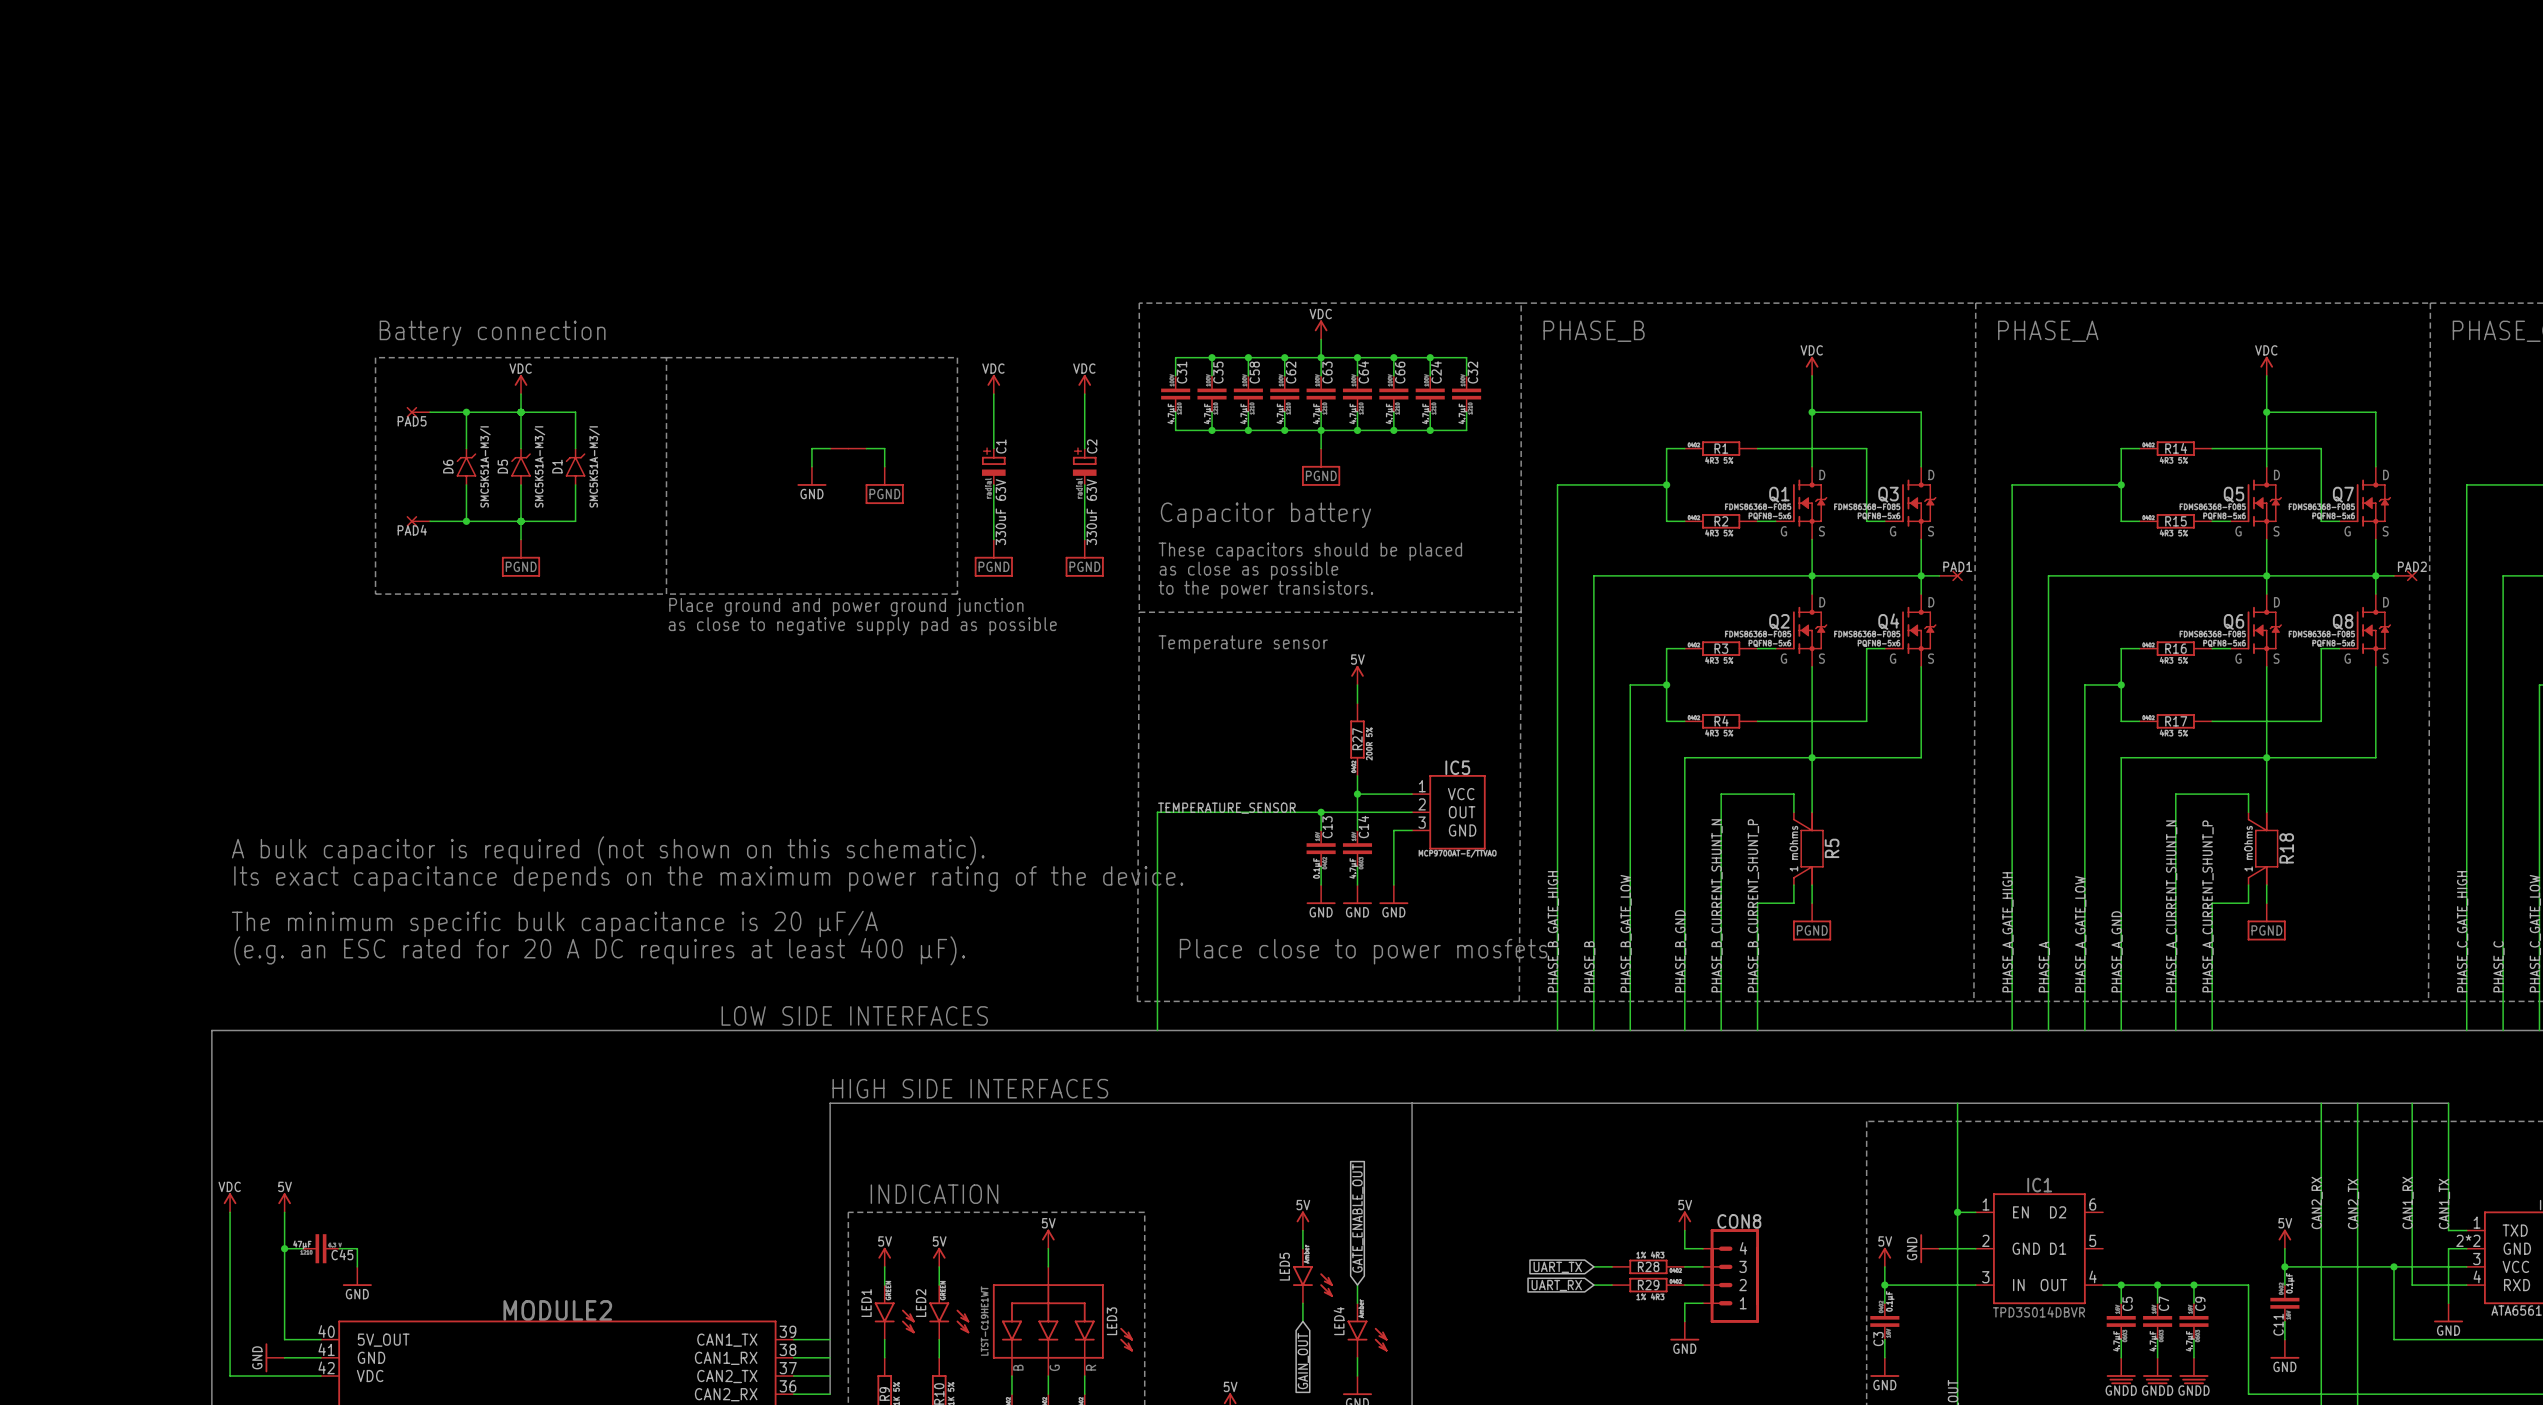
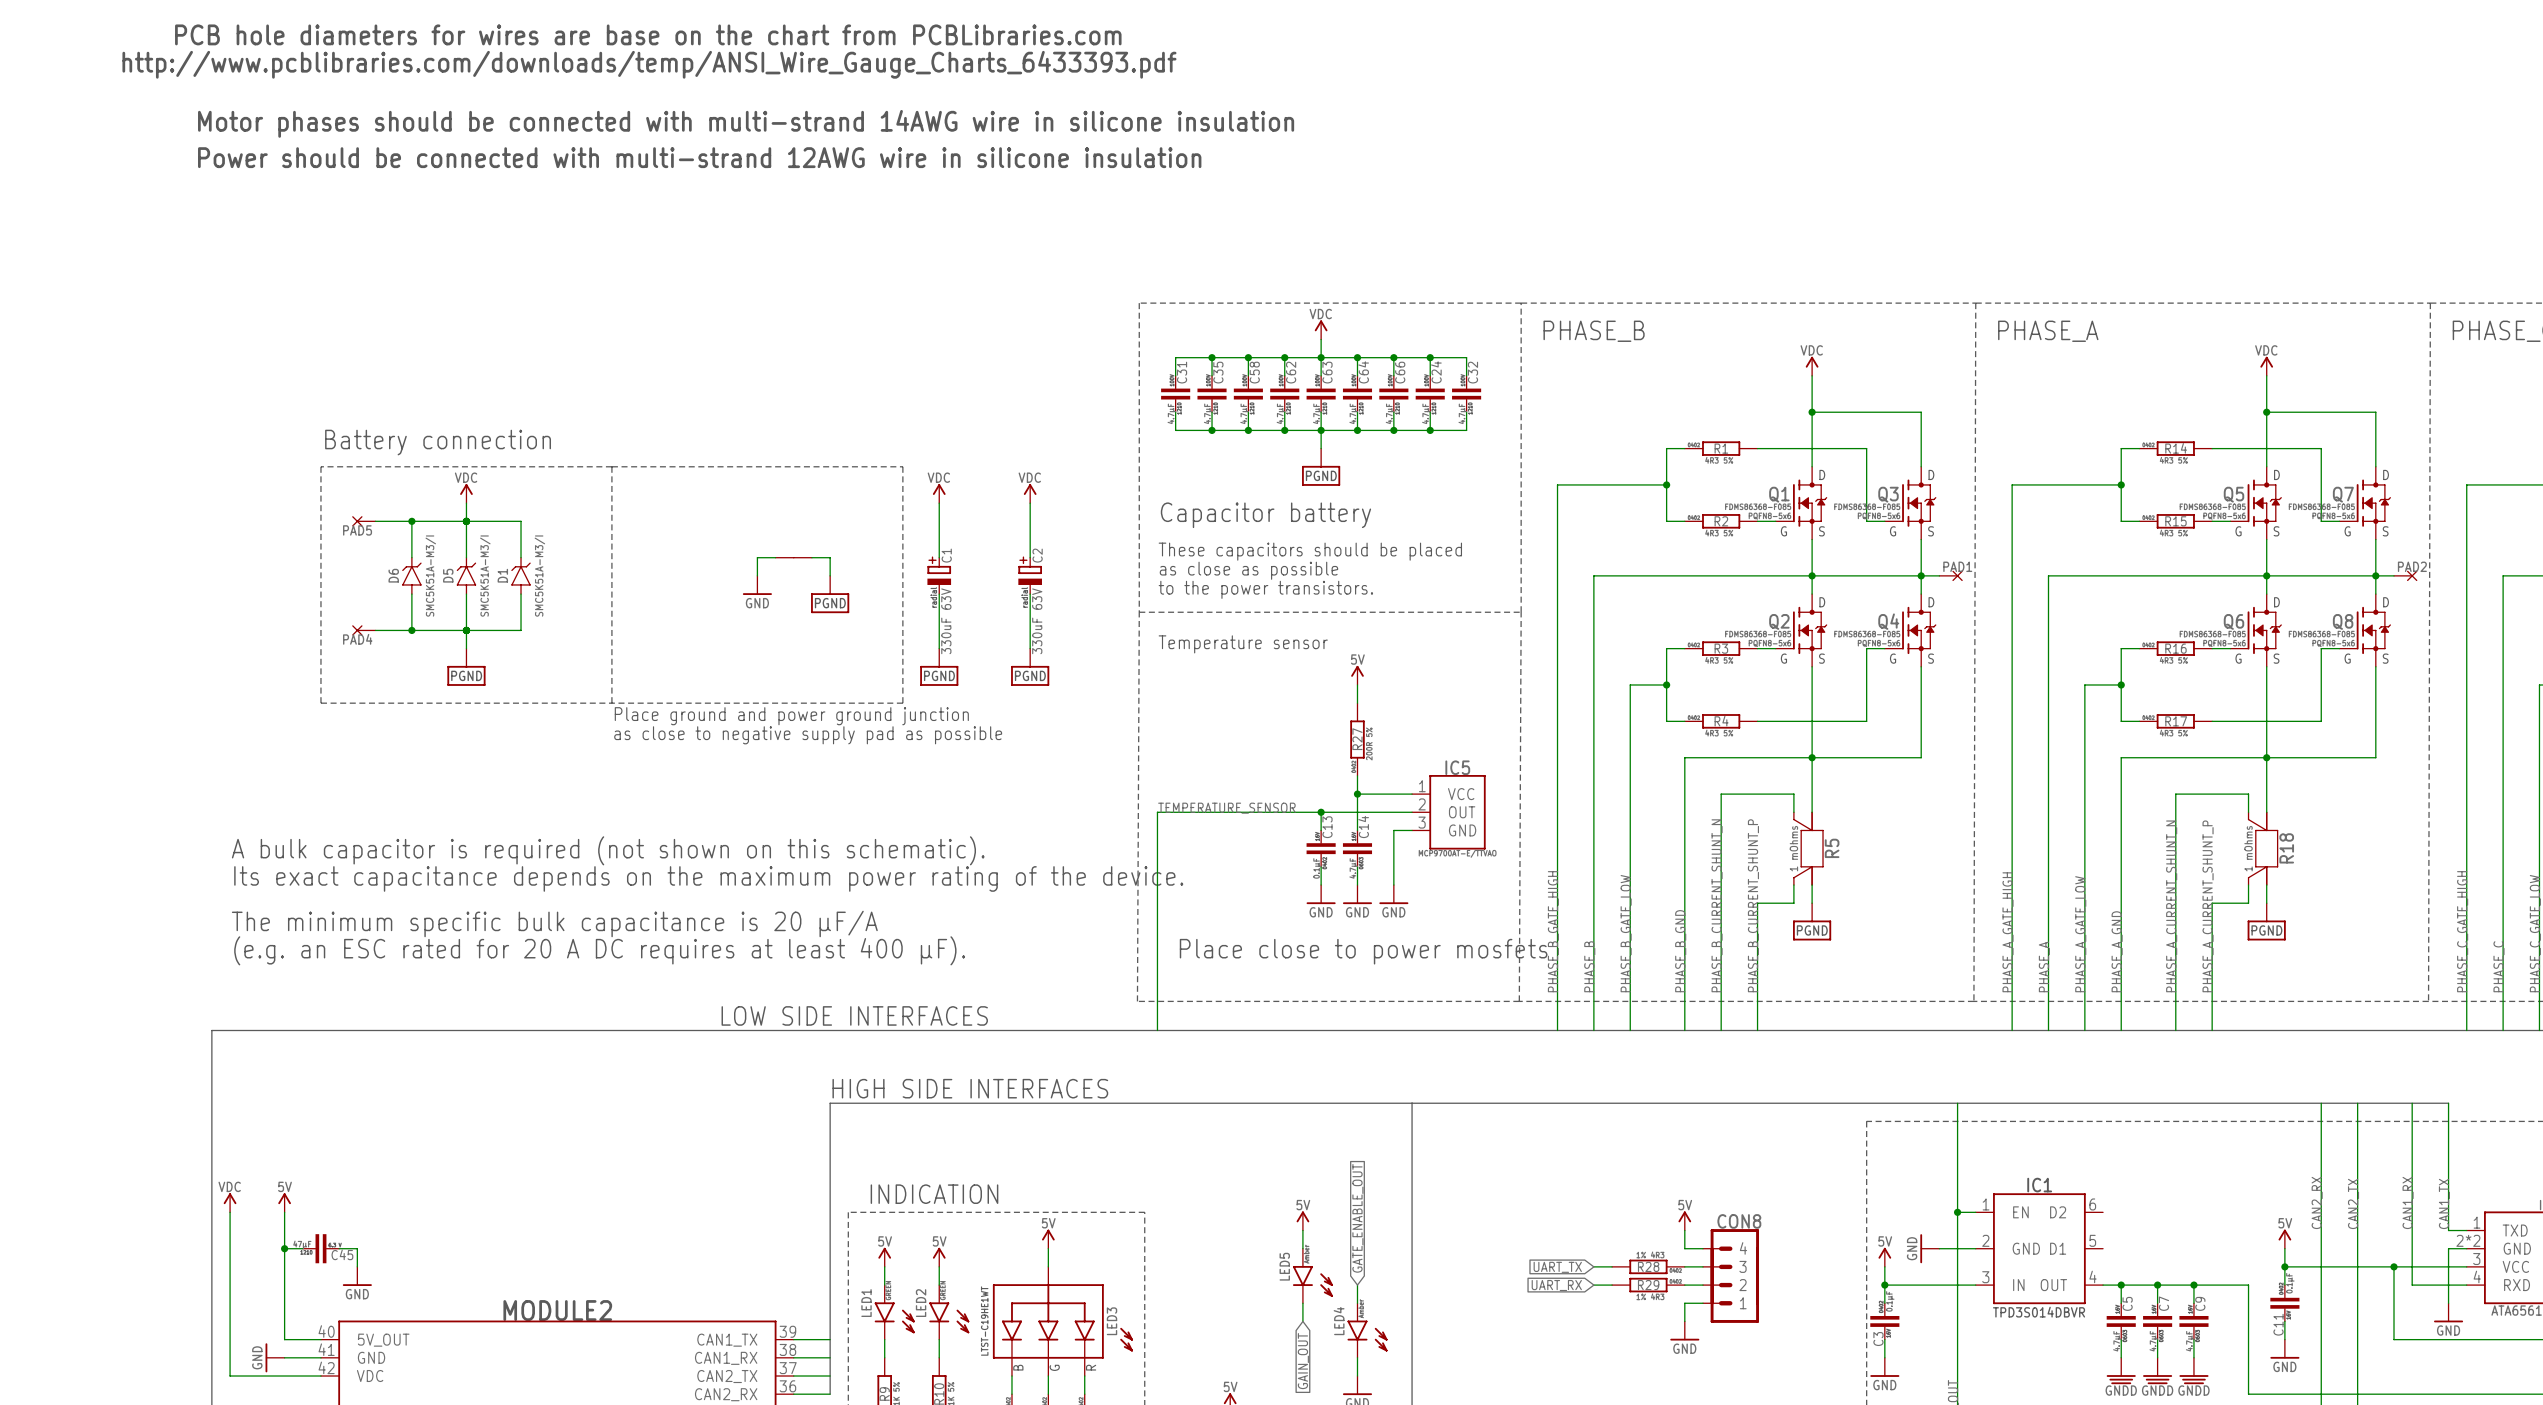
text: none -> PCB hole diameters for wires are base on the chart from PCBLibraries.com (648, 34)
text: none -> http://www.pcblibraries.com/downloads/temp/ANSI_Wire_Gauge_Charts_6433393.pdf (649, 64)
text: none -> Motor phases should be connected with multi-strand 14AWG wire in silicone insulation (746, 123)
text: none -> Power should be connected with multi-strand 12AWG wire in silicone insulation (699, 157)
text position: Battery connection (492, 333) -> Battery connection (438, 442)
line: (375, 357) (375, 594) (957, 594) (957, 357) (375, 357) -> (320, 466) (320, 703) (902, 703) (902, 466) (320, 466)
line: (666, 357) (666, 594) -> (611, 466) (611, 703)
power symbol position: VDC (521, 384) -> VDC (466, 493)
power symbol: VDC (993, 384) -> none
power symbol: VDC (1084, 384) -> none
wire: (521, 394) (521, 448) -> none
wire: (993, 394) (993, 448) -> (939, 503) (939, 557)
wire: (1084, 394) (1084, 448) -> (1030, 503) (1030, 557)
PAD5 position: (418, 412) -> (363, 521)
wire: (430, 412) (575, 412) (575, 448) -> none
wire: (466, 412) (466, 448) -> (411, 521) (411, 557)
junction: (466, 412) -> none
junction: (521, 412) -> none
wire: (830, 448) (811, 448) (811, 466) -> (775, 557) (757, 557) (757, 575)
part position: (848, 448) -> (793, 557)
wire: (866, 448) (884, 448) (884, 466) -> (811, 557) (830, 557) (830, 575)
D6 position: (466, 466) -> (411, 575)
D5 position: (521, 466) -> (466, 575)
D1 position: (575, 466) -> (521, 575)
C1 position: (993, 466) -> (939, 575)
C2 position: (1084, 466) -> (1030, 575)
power symbol position: GND (811, 476) -> GND (757, 585)
wire: (521, 484) (521, 521) (575, 521) (575, 484) -> none
wire: (993, 484) (993, 539) -> (939, 594) (939, 648)
wire: (1084, 484) (1084, 539) -> (1030, 594) (1030, 648)
power symbol: PGND (884, 485) -> none
power symbol: none -> VDC (939, 493)
power symbol: none -> VDC (1030, 493)
wire: none -> (375, 521) (430, 521)
junction: none -> (411, 521)
PAD4 position: (418, 521) -> (363, 630)
wire: none -> (466, 521) (466, 557)
junction: (521, 521) -> none
power symbol position: PGND (521, 558) -> PGND (466, 667)
power symbol: PGND (993, 558) -> none
power symbol: PGND (1084, 558) -> none
wire: none -> (411, 594) (411, 630)
wire: none -> (466, 594) (466, 648)
wire: none -> (521, 594) (521, 630) (375, 630)
power symbol: none -> PGND (830, 594)
text position: Place ground and power ground junction (846, 607) -> Place ground and power ground junction (791, 716)
text position: as close to negative supply pad as possible (862, 626) -> as close to negative supply pad as possible (808, 735)
junction: none -> (411, 630)
junction: none -> (466, 630)
power symbol: none -> PGND (939, 667)
power symbol: none -> PGND (1030, 667)

